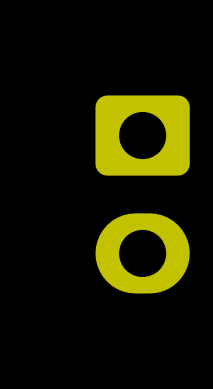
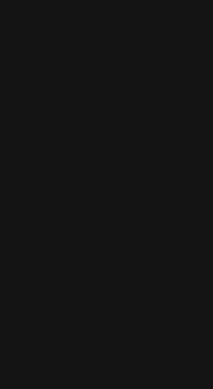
part: (142, 194) -> none

